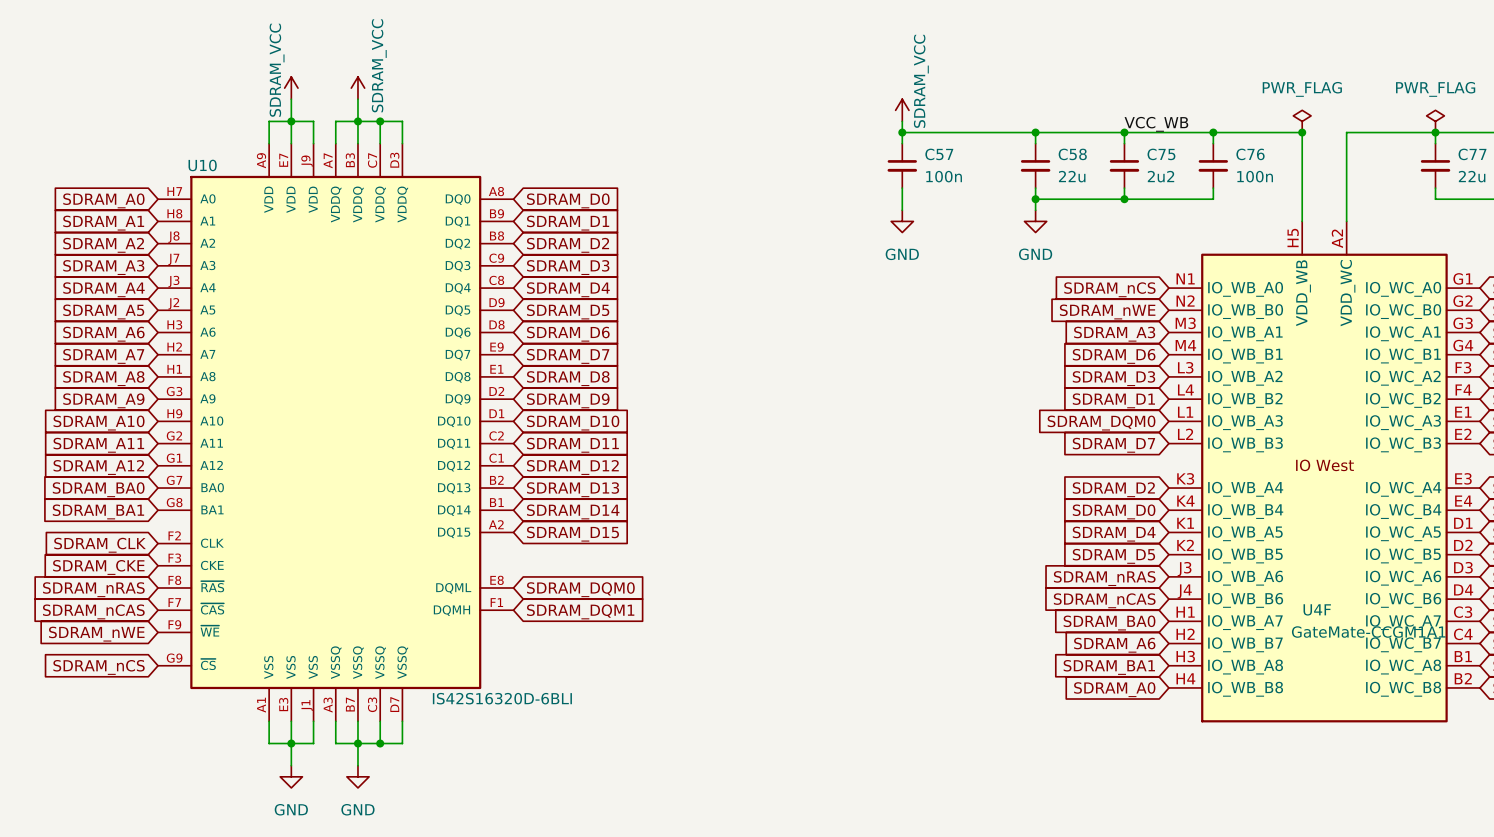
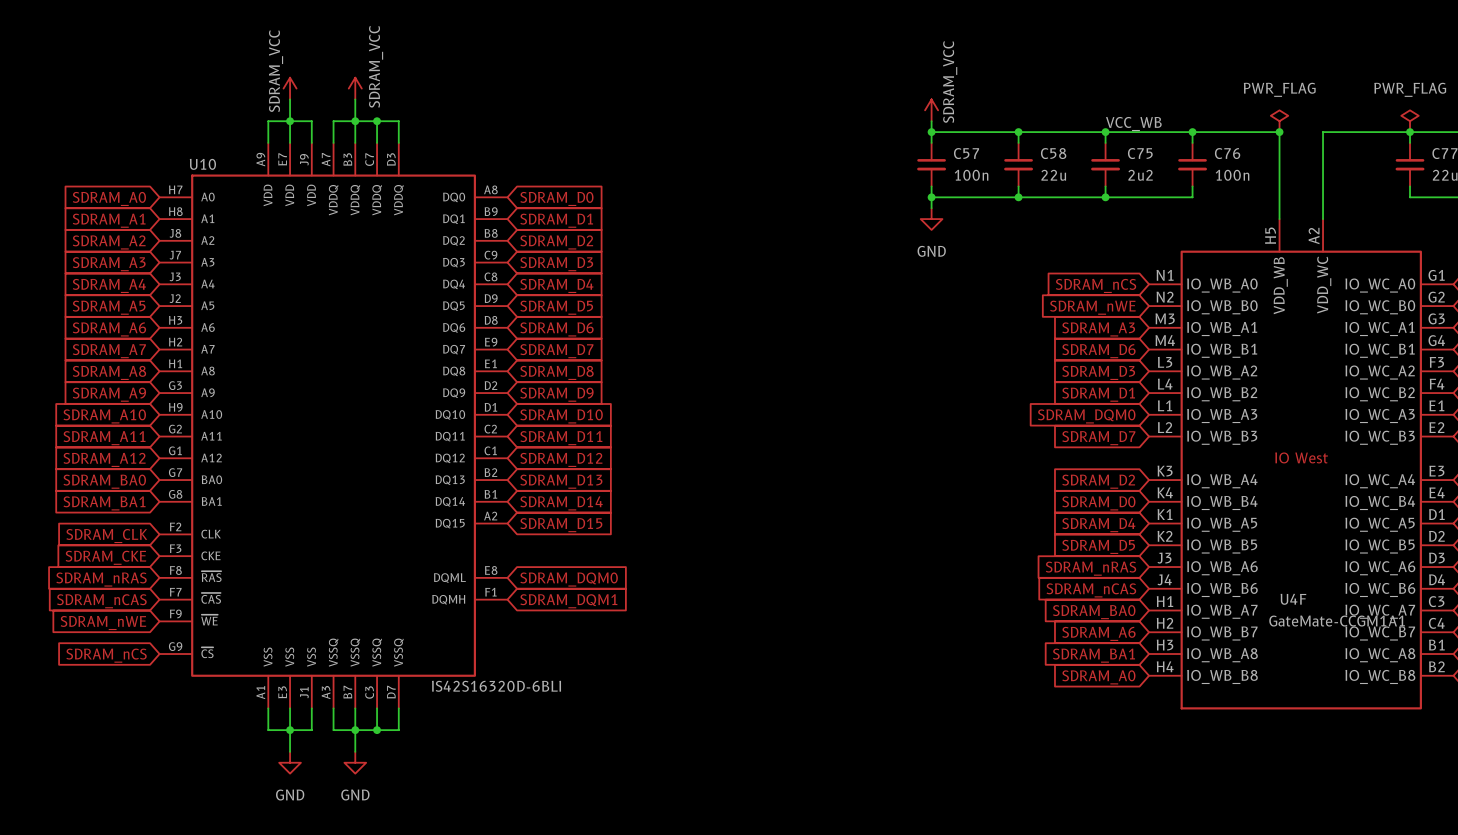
power symbol position: SDRAM_VCC (902, 110) -> SDRAM_VCC (931, 110)
wire: (902, 121) (902, 143) -> (931, 121) (931, 142)
wire: (902, 132) (946, 132) -> none
junction: (902, 132) -> none
junction: none -> (931, 132)
C57 position: (902, 165) -> (931, 164)
wire: (902, 188) (902, 210) -> (931, 186) (931, 208)
junction: none -> (931, 197)
wire: (1035, 199) (1035, 210) -> (1018, 197) (931, 197)
power symbol: GND (902, 221) -> none
power symbol: none -> GND (931, 219)
power symbol: GND (1035, 221) -> none

